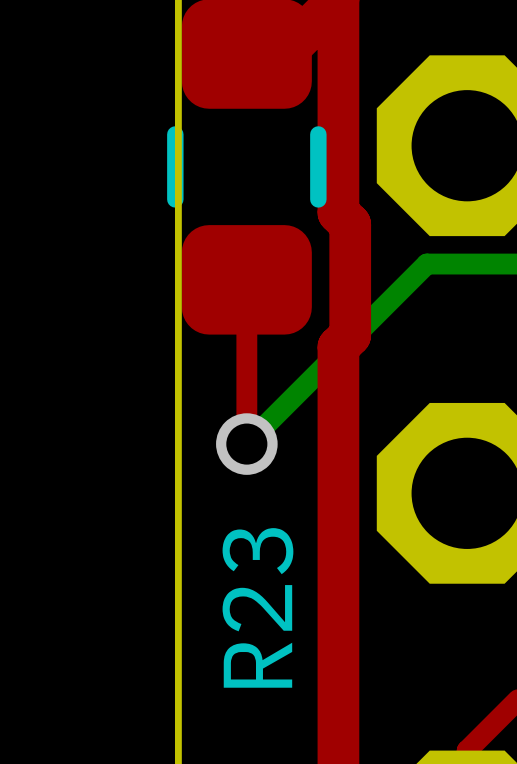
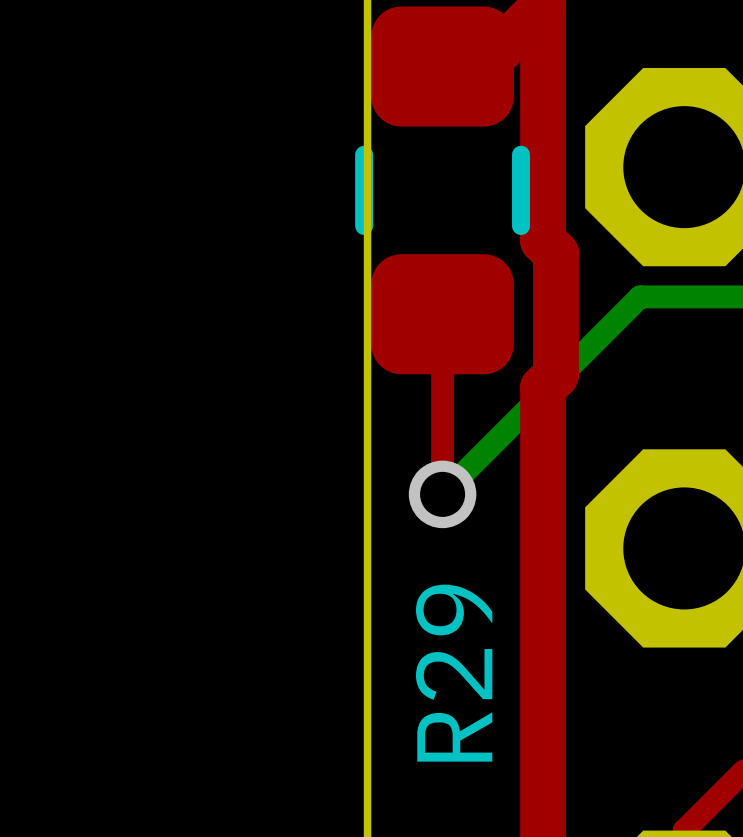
R23 name: R23 (257, 607) -> R29 (454, 673)

